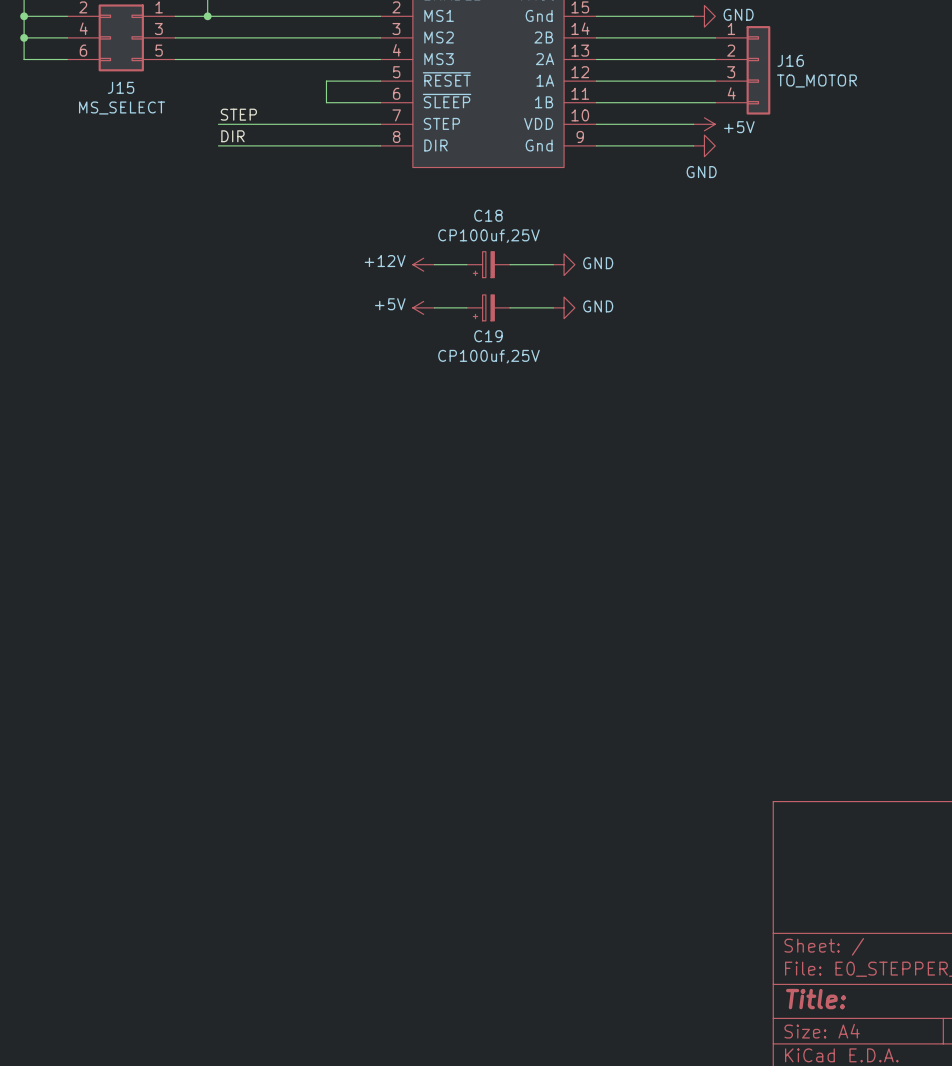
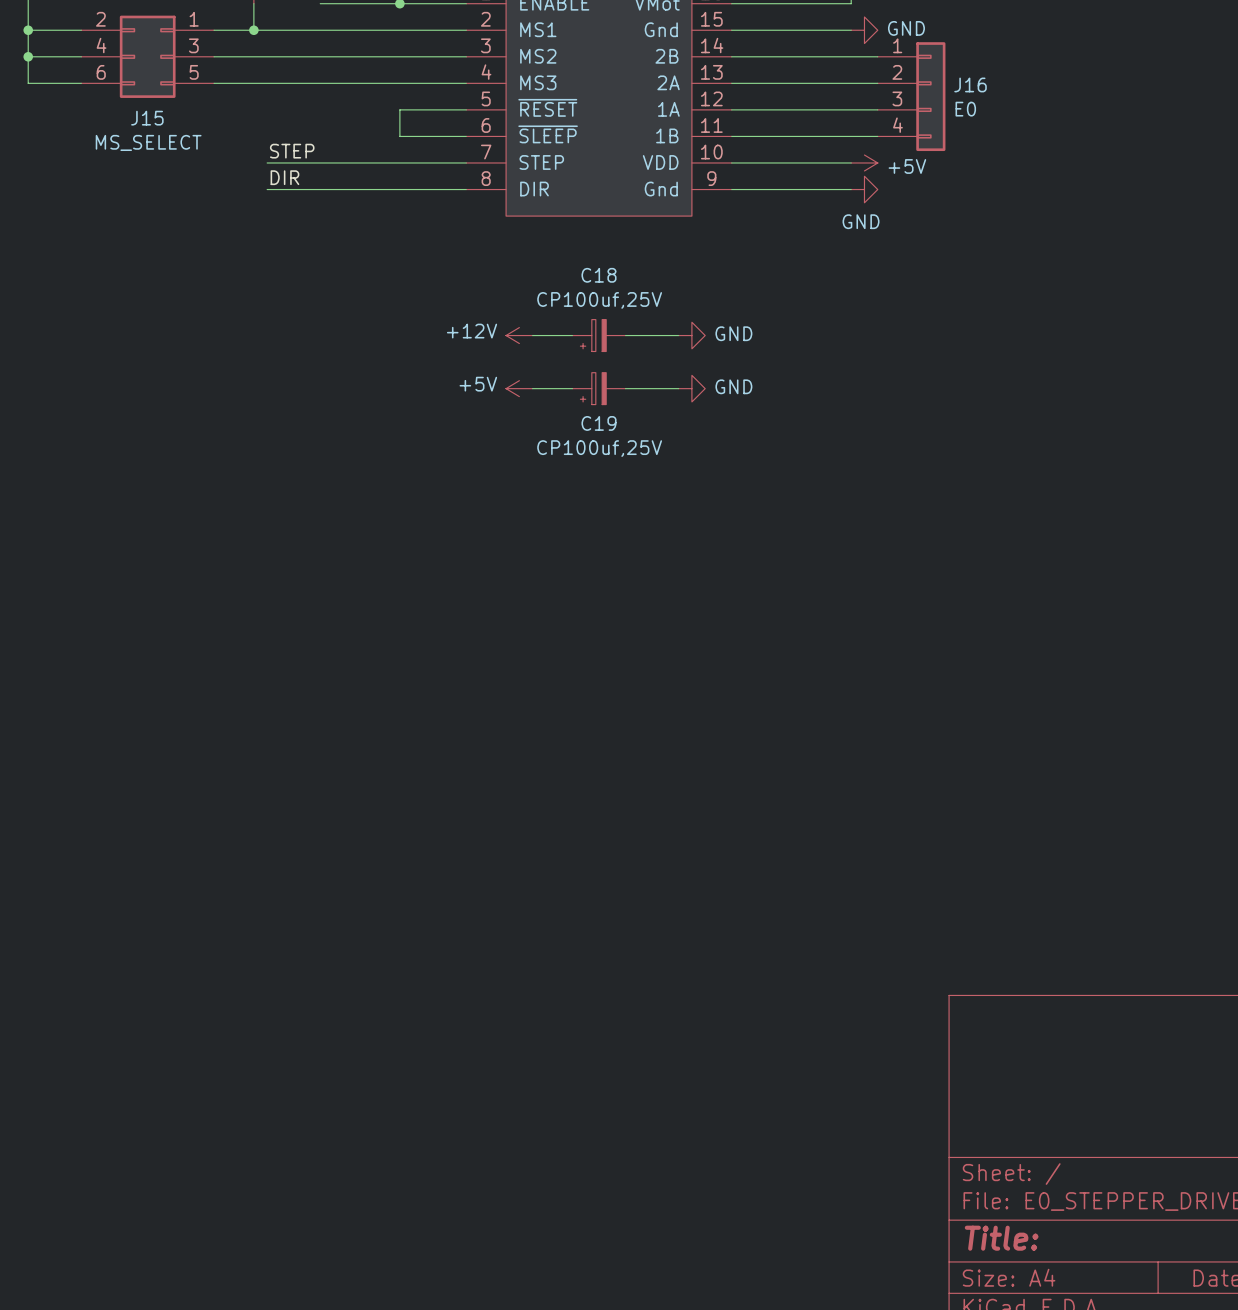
J16 value: TO_MOTOR (816, 81) -> E0 (965, 109)

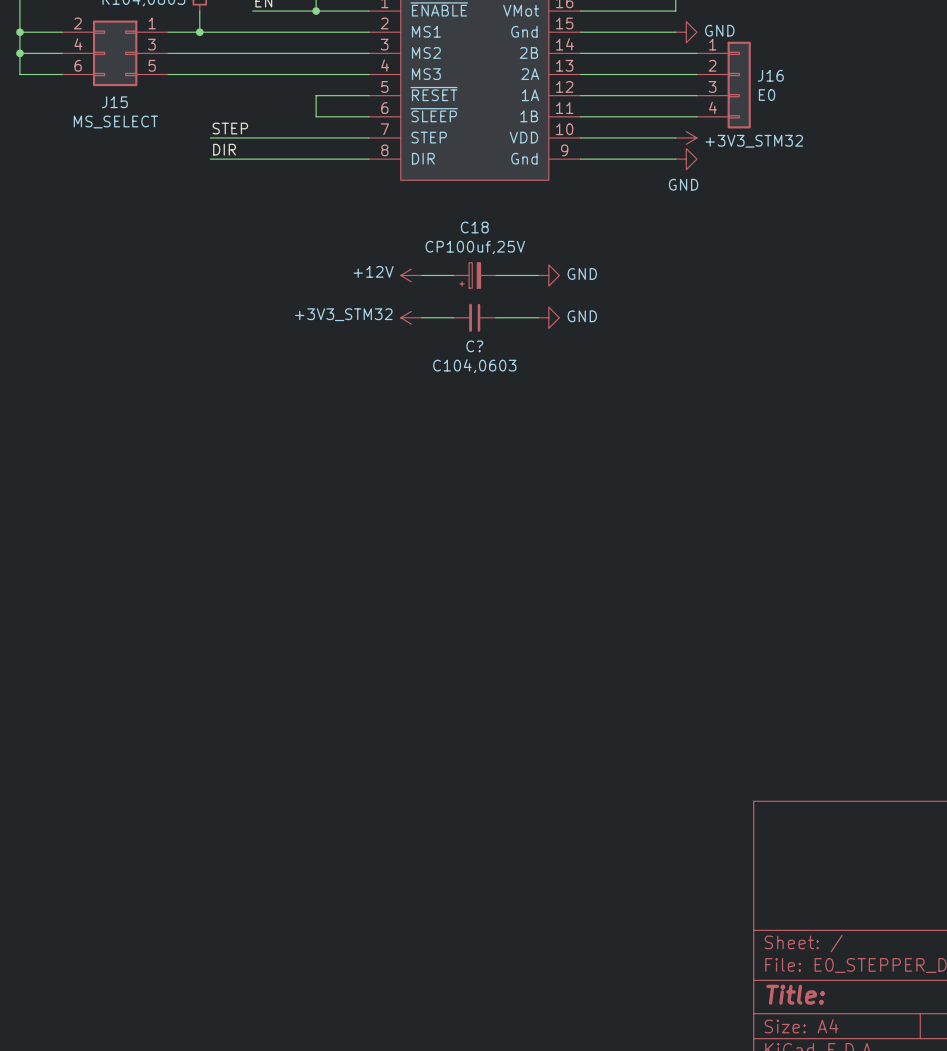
power symbol: +5V (864, 162) -> +3V3_STM32 (686, 137)
power symbol: +5V (519, 388) -> +3V3_STM32 (411, 317)
C19: CP100uf,25V (599, 388) -> none
C?: none -> C104,0603 (474, 317)

